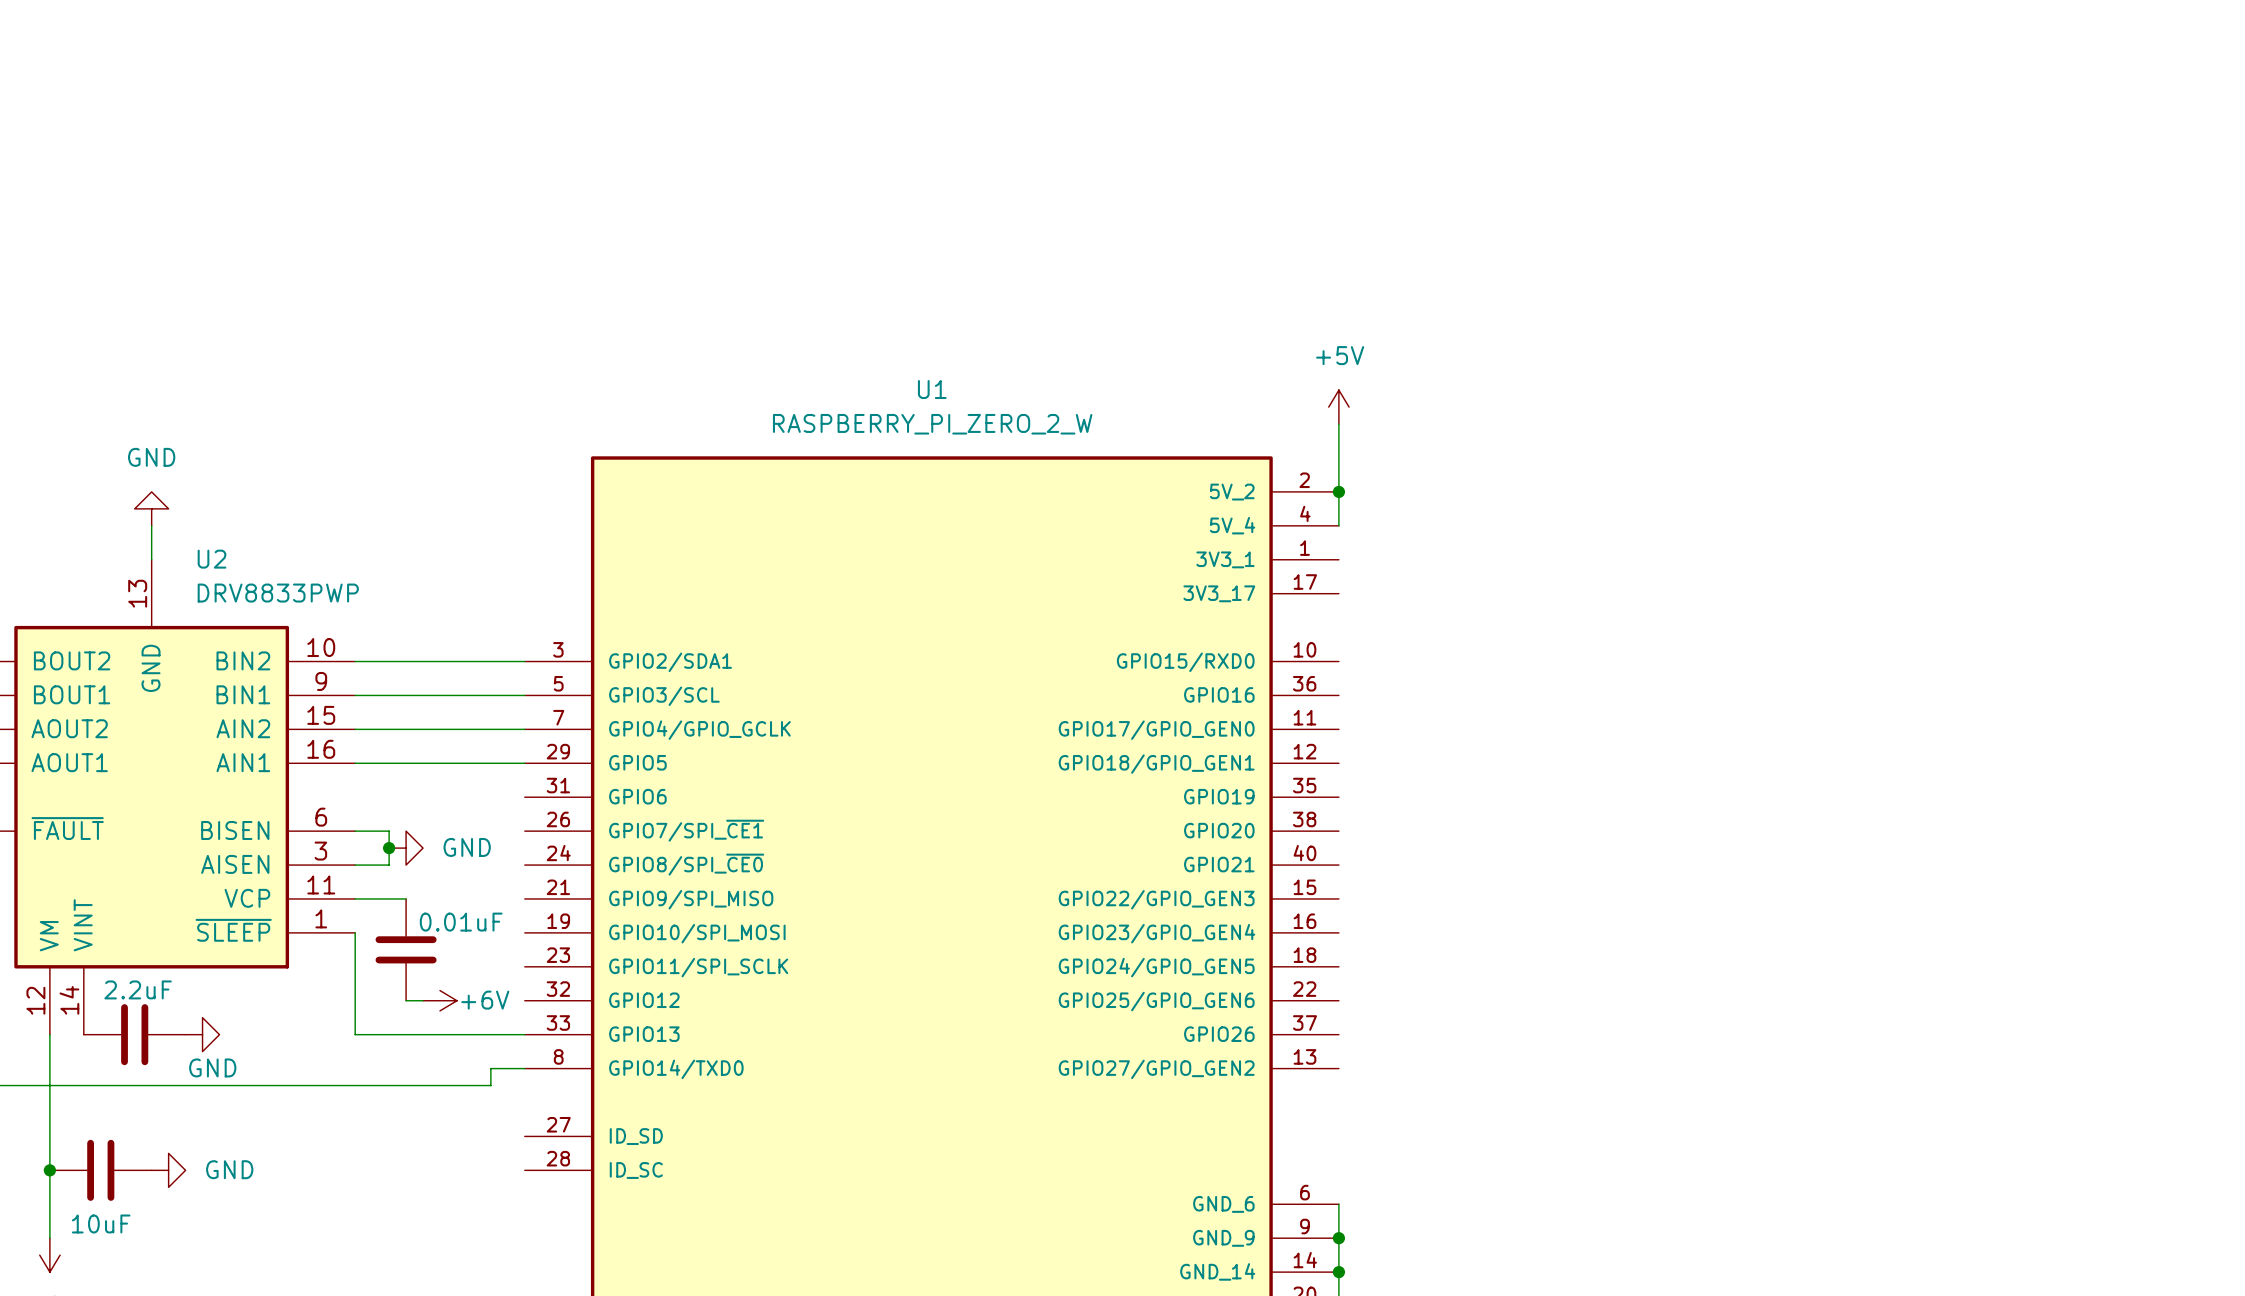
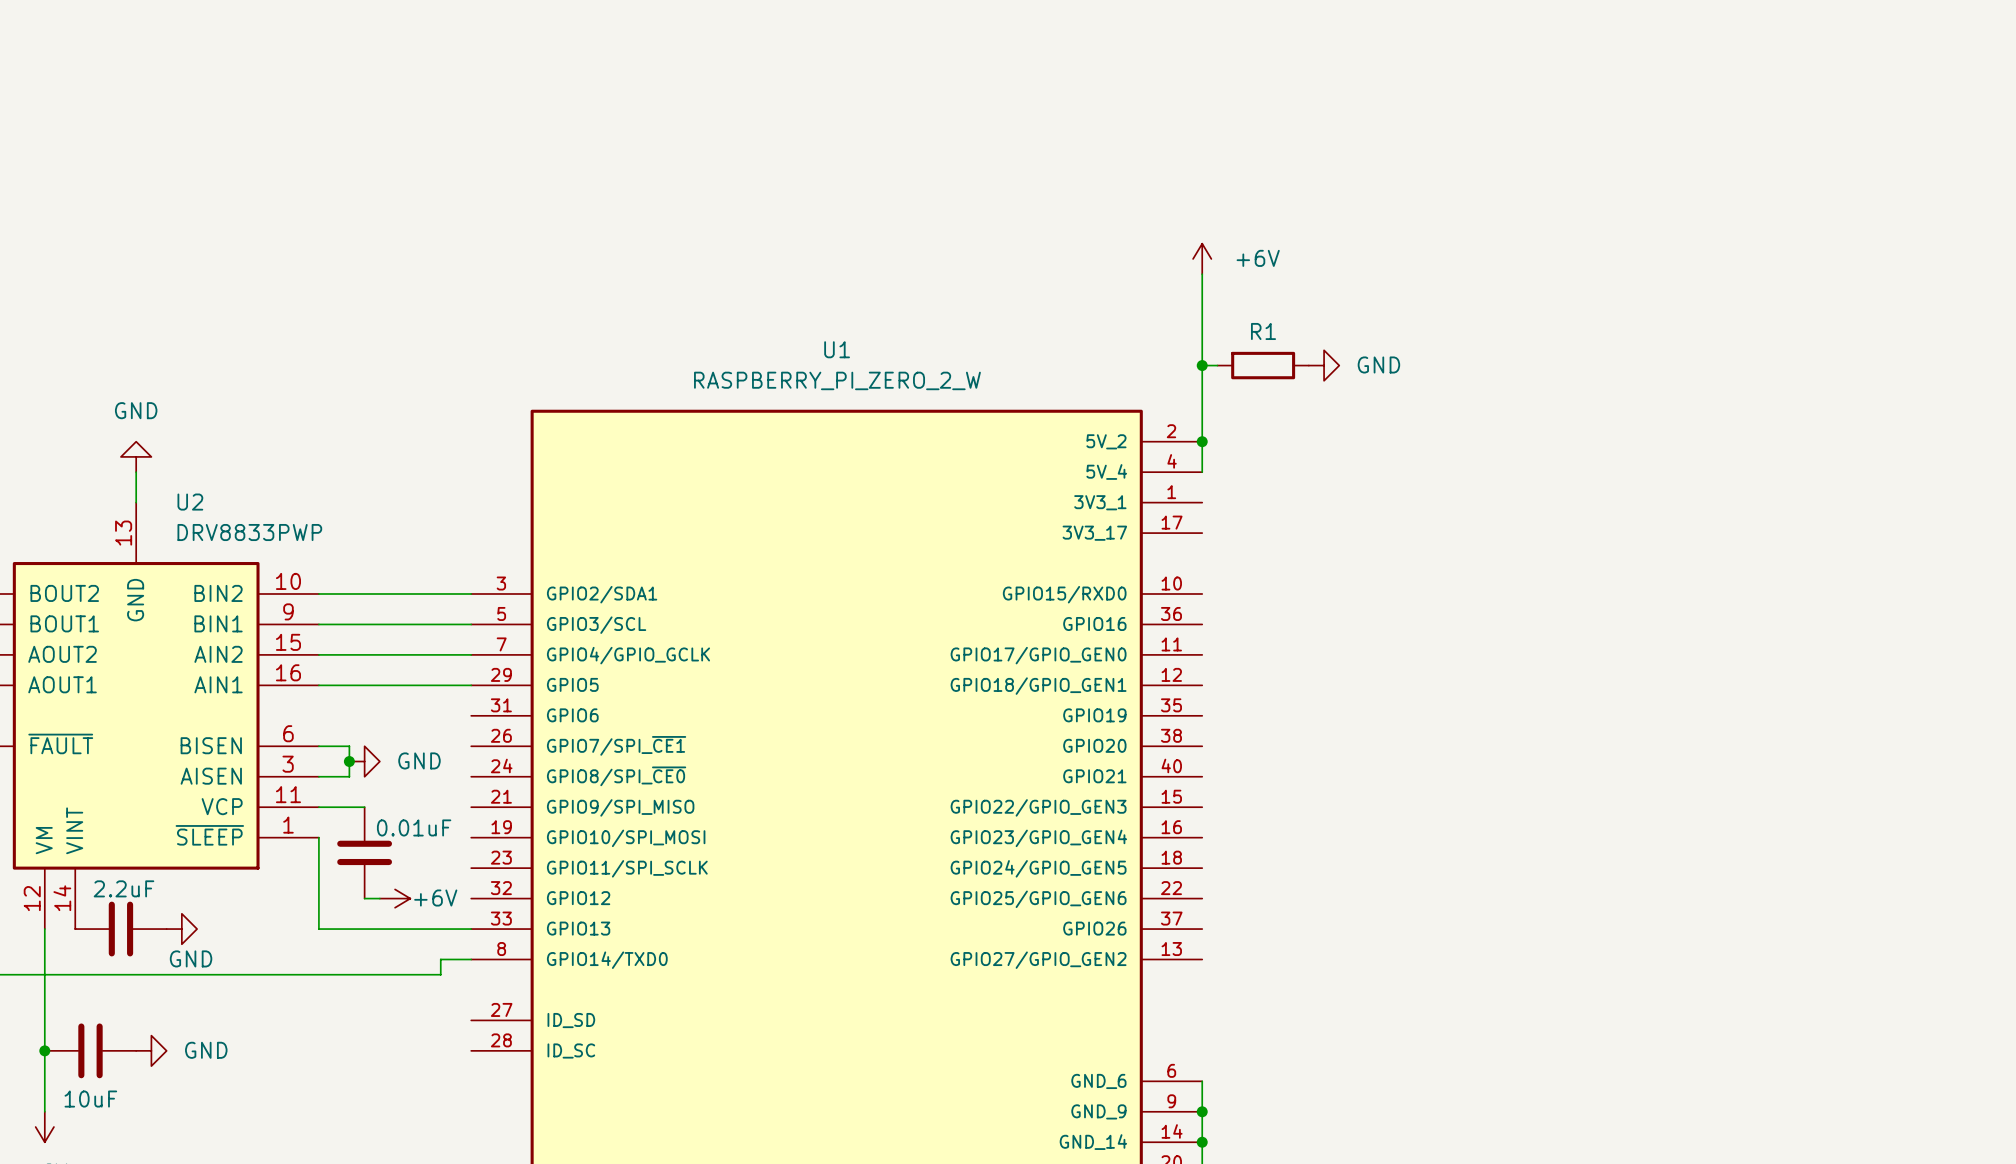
power symbol: none -> +6V (1202, 258)
wire: none -> (1202, 274) (1202, 380)
wire: none -> (1202, 365) (1217, 365)
power symbol: +5V (1338, 407) -> none
junction: none -> (1202, 365)
R1: none -> (1263, 365)
power symbol: none -> GND (1324, 365)

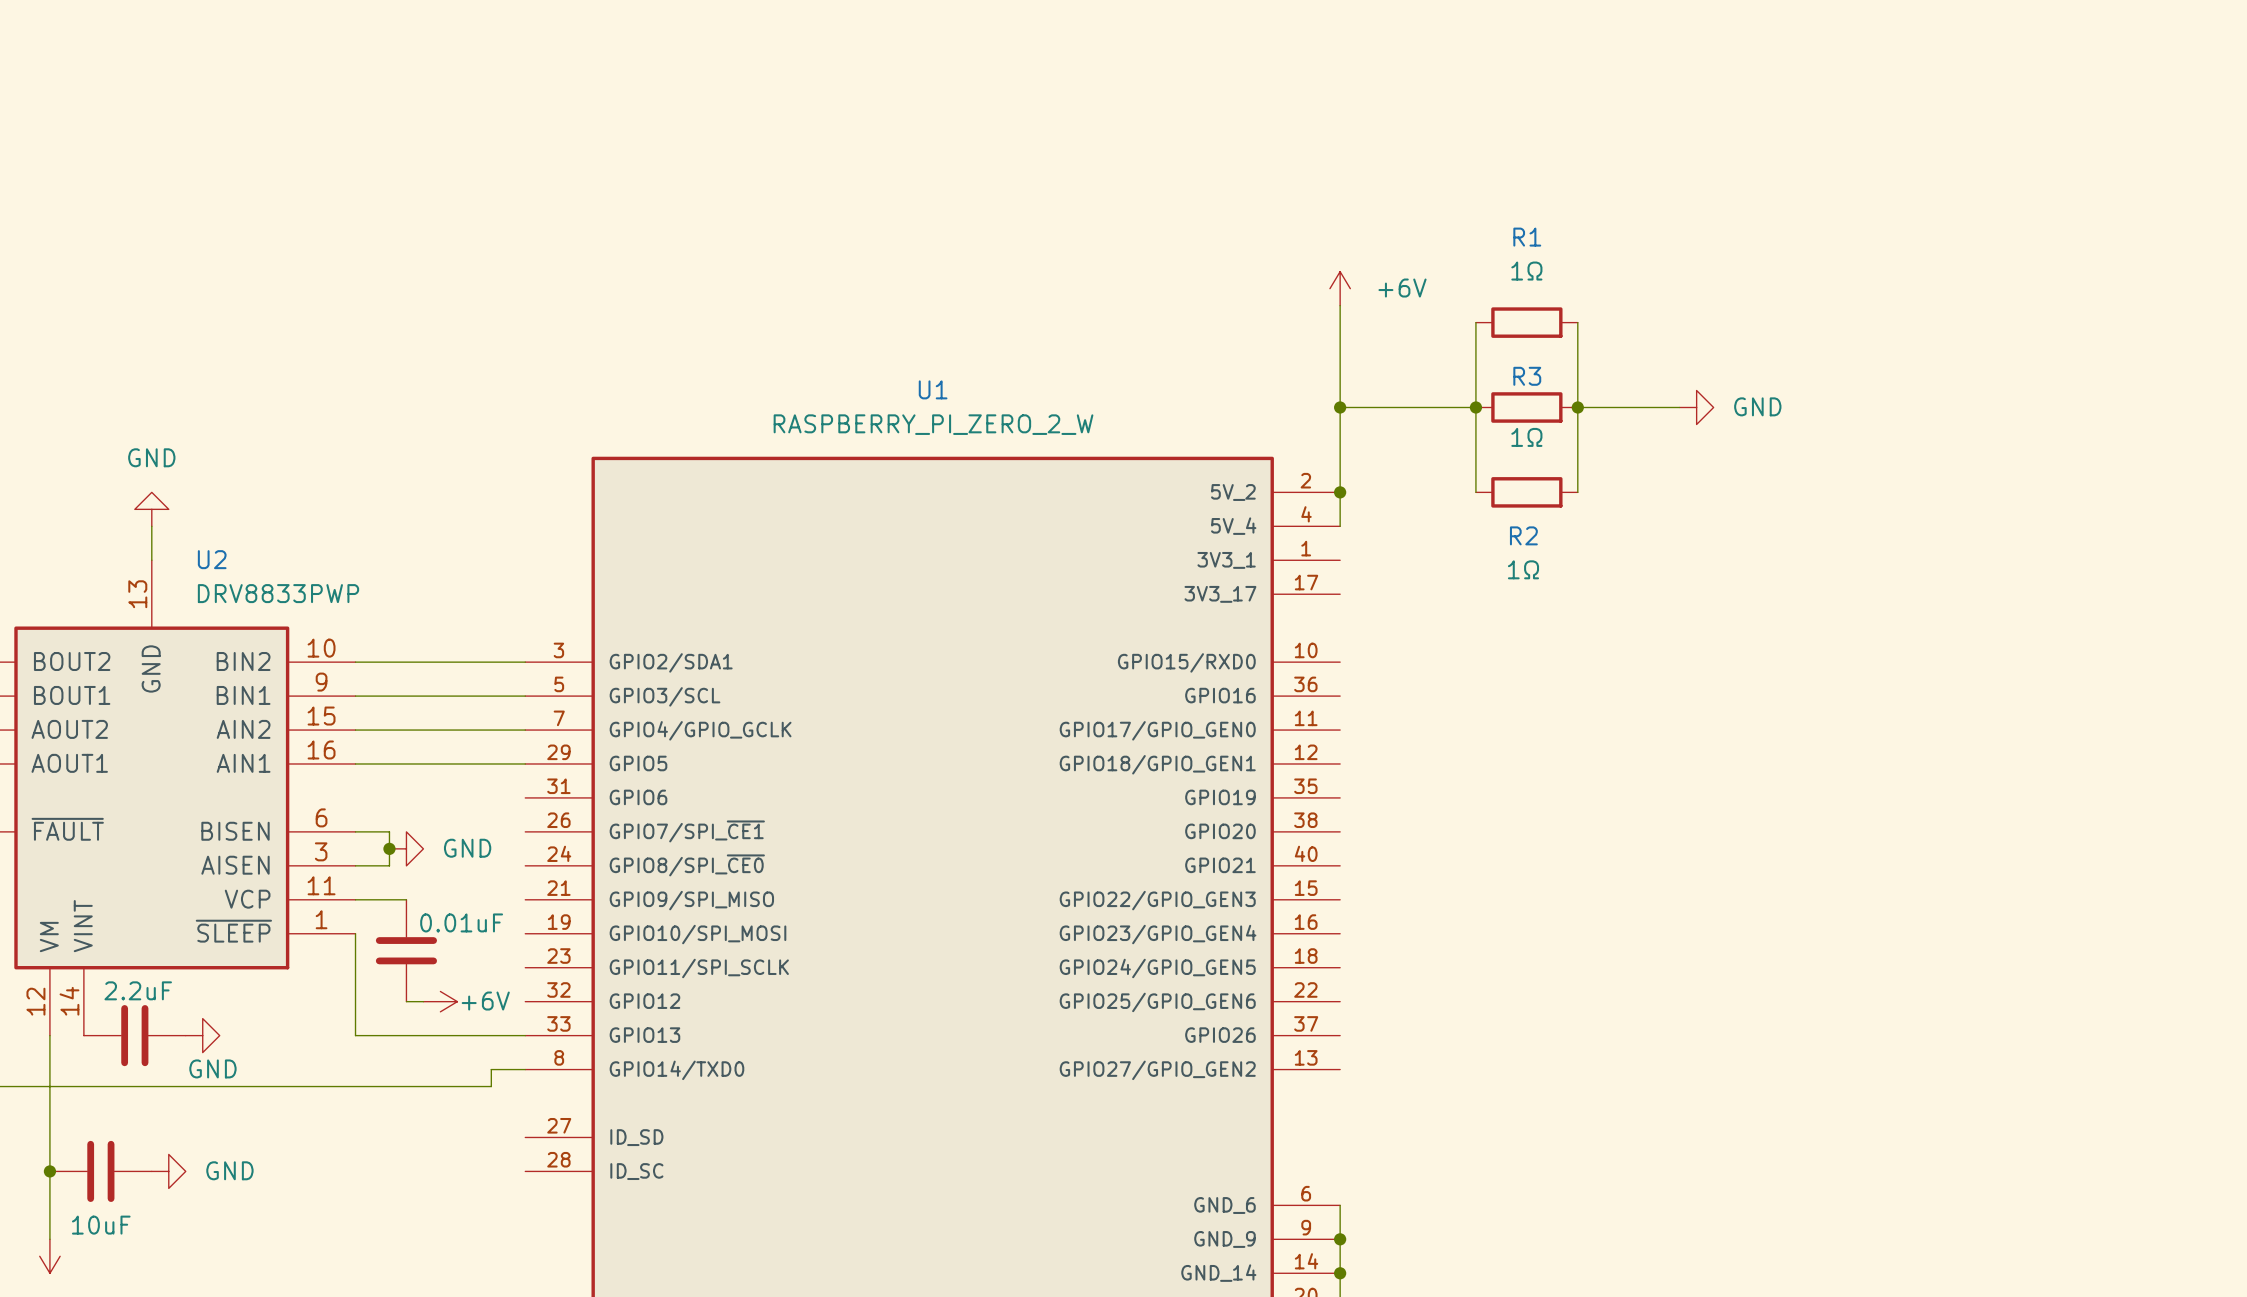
R1 value: none -> 1Ω (1526, 271)
wire: none -> (1475, 322) (1475, 492)
wire: none -> (1577, 322) (1577, 492)
R1 name position: R1 (1263, 331) -> R1 (1527, 237)
wire: none -> (1357, 407) (1475, 407)
R1 position: (1263, 365) -> (1526, 322)
power symbol position: GND (1324, 365) -> GND (1696, 407)
junction: none -> (1475, 407)
R3: none -> 1Ω (1526, 407)
wire: none -> (1577, 407) (1679, 407)
junction: none -> (1577, 407)
R2: none -> 1Ω (1526, 492)

